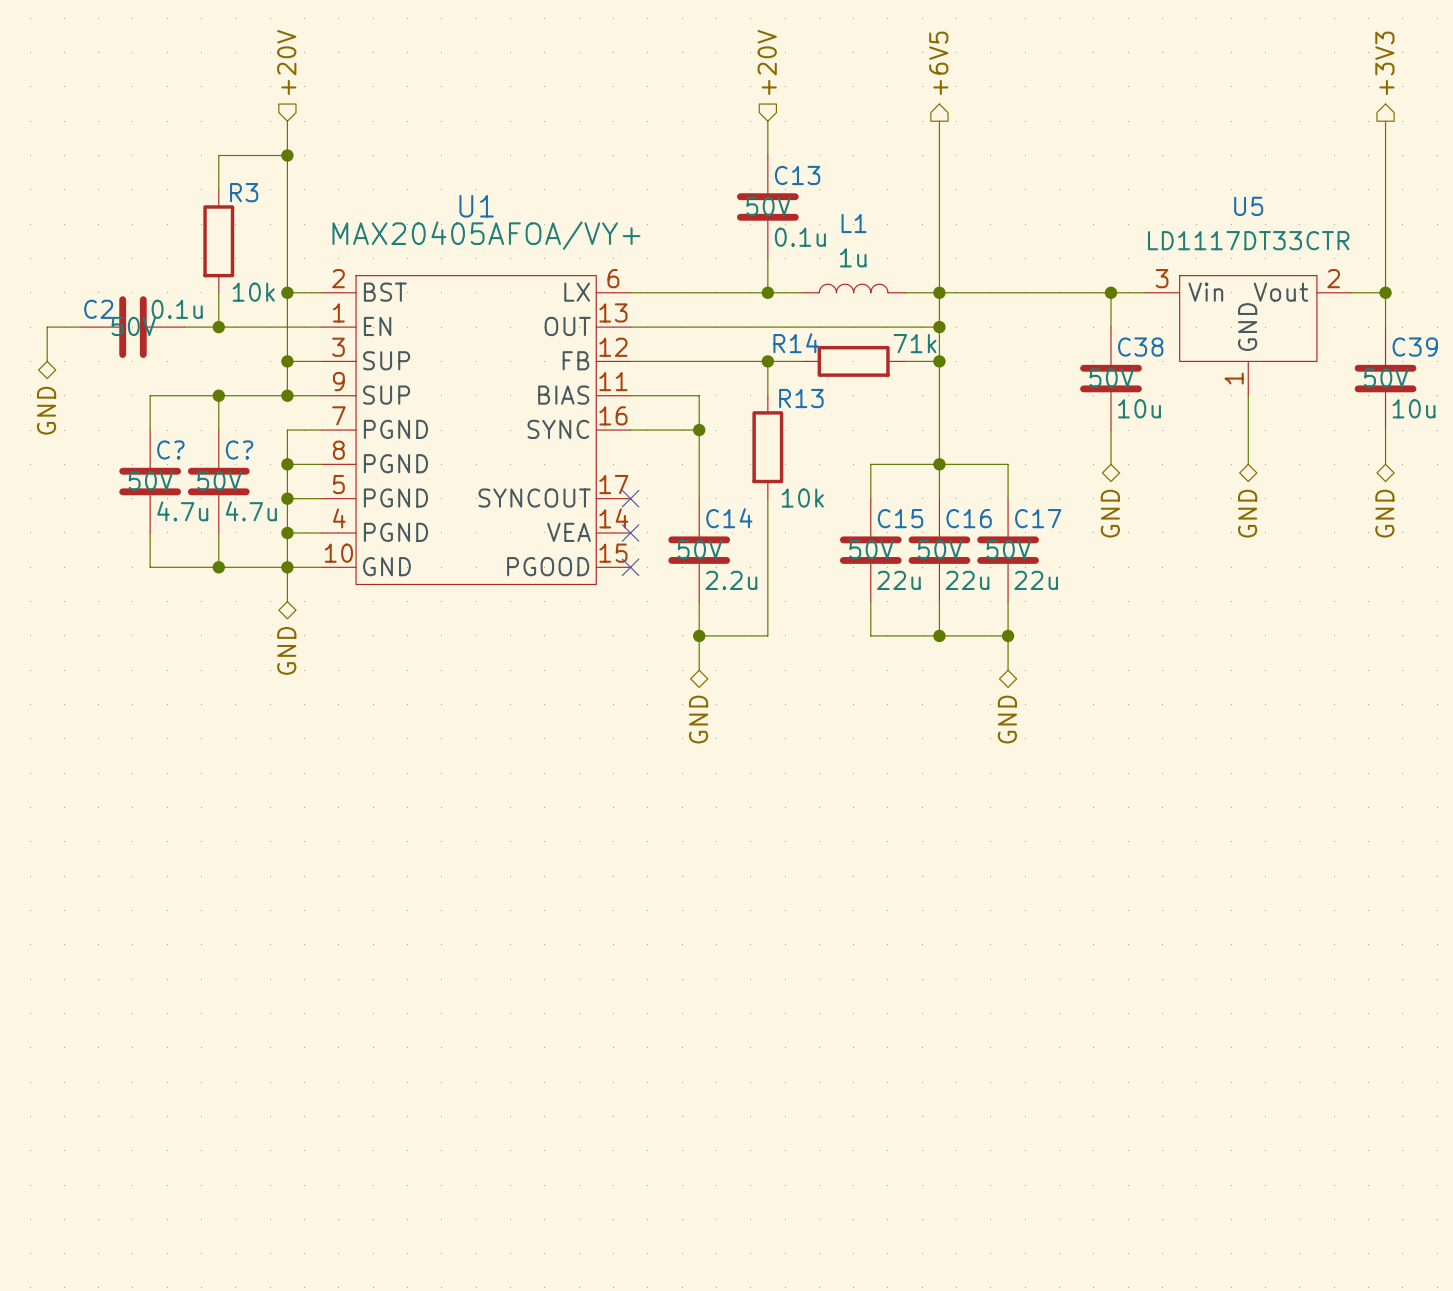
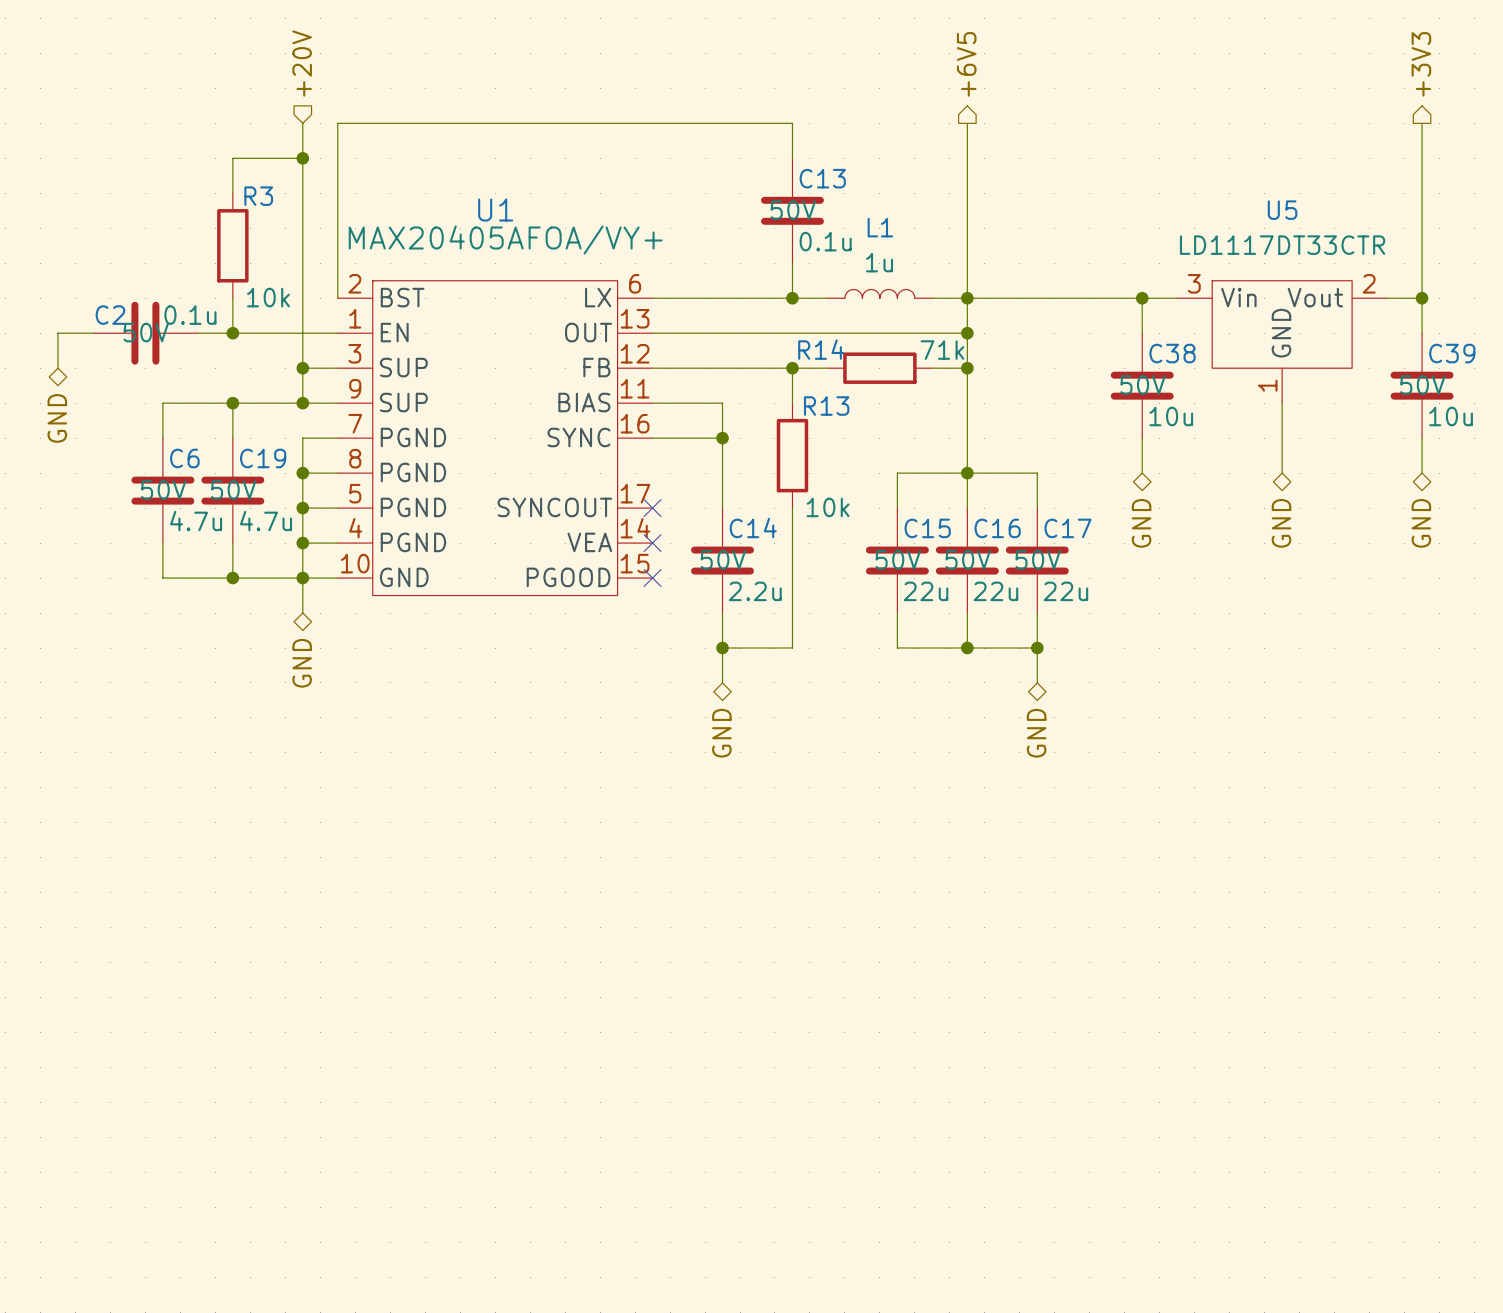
hierarchical label: +20V (767, 62) -> none
wire: (287, 292) (321, 292) -> (792, 123) (337, 123) (337, 298)
junction: (287, 292) -> none
C? name: C? (170, 449) -> C6 (184, 458)
C? name: C? (239, 449) -> C19 (263, 458)

